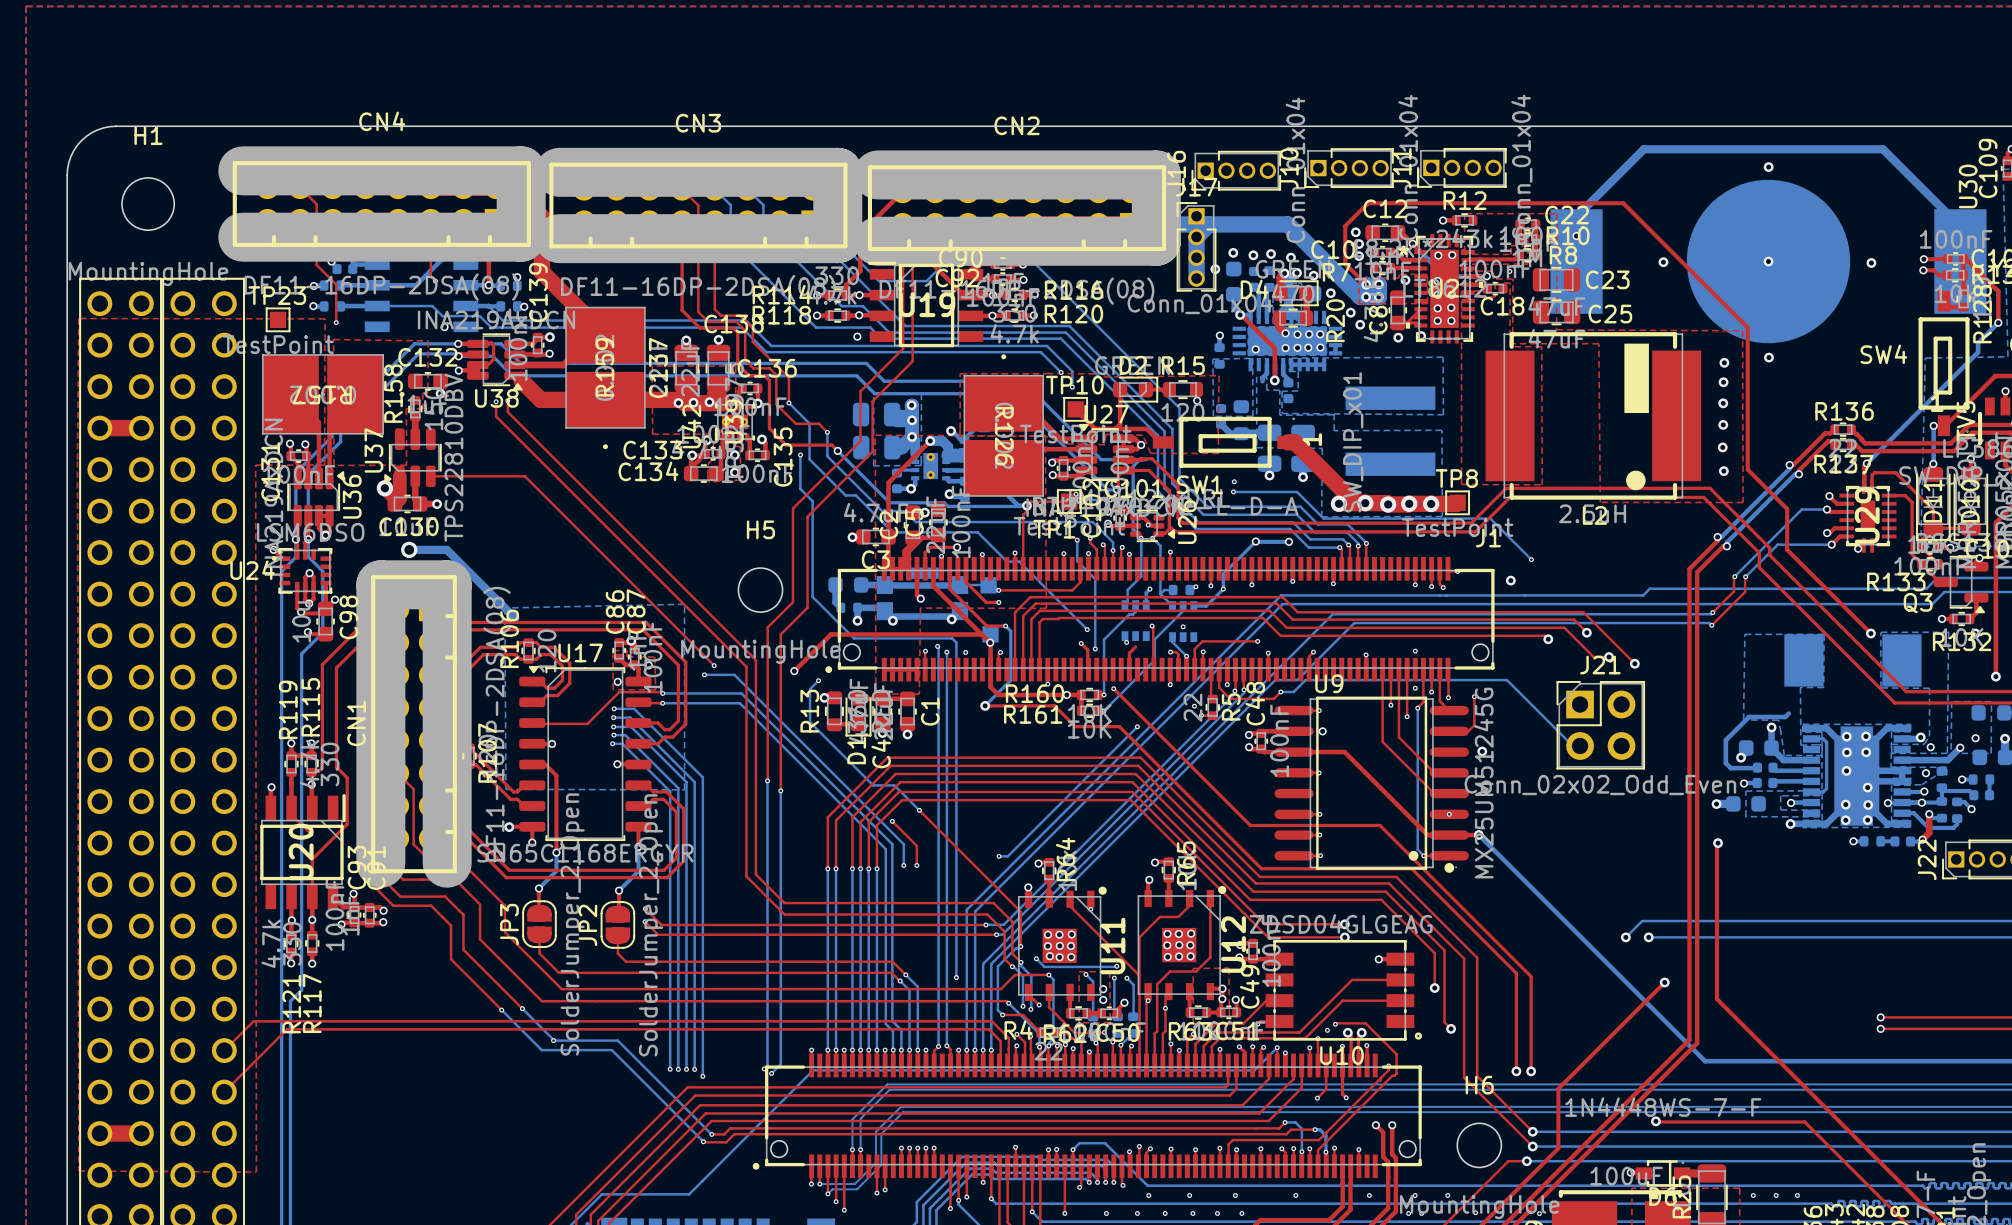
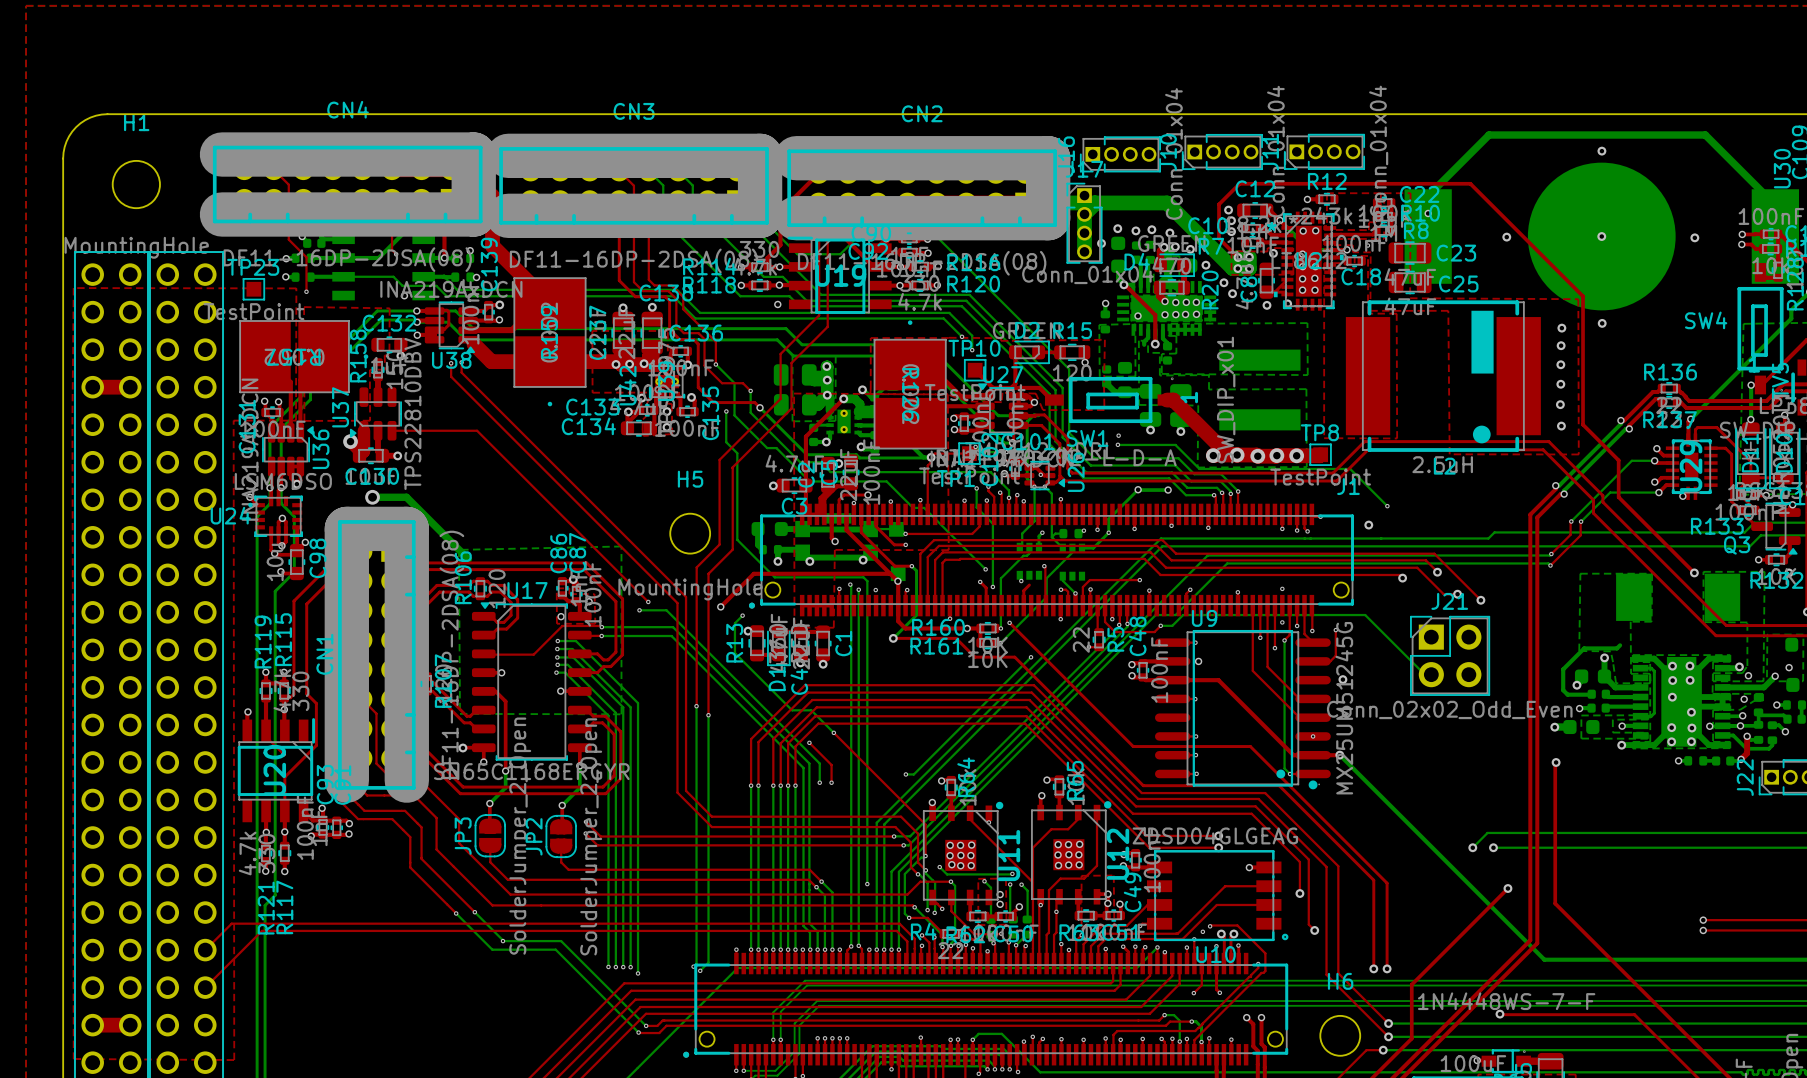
via: (1183, 626) -> none
via: (1194, 706) -> none

